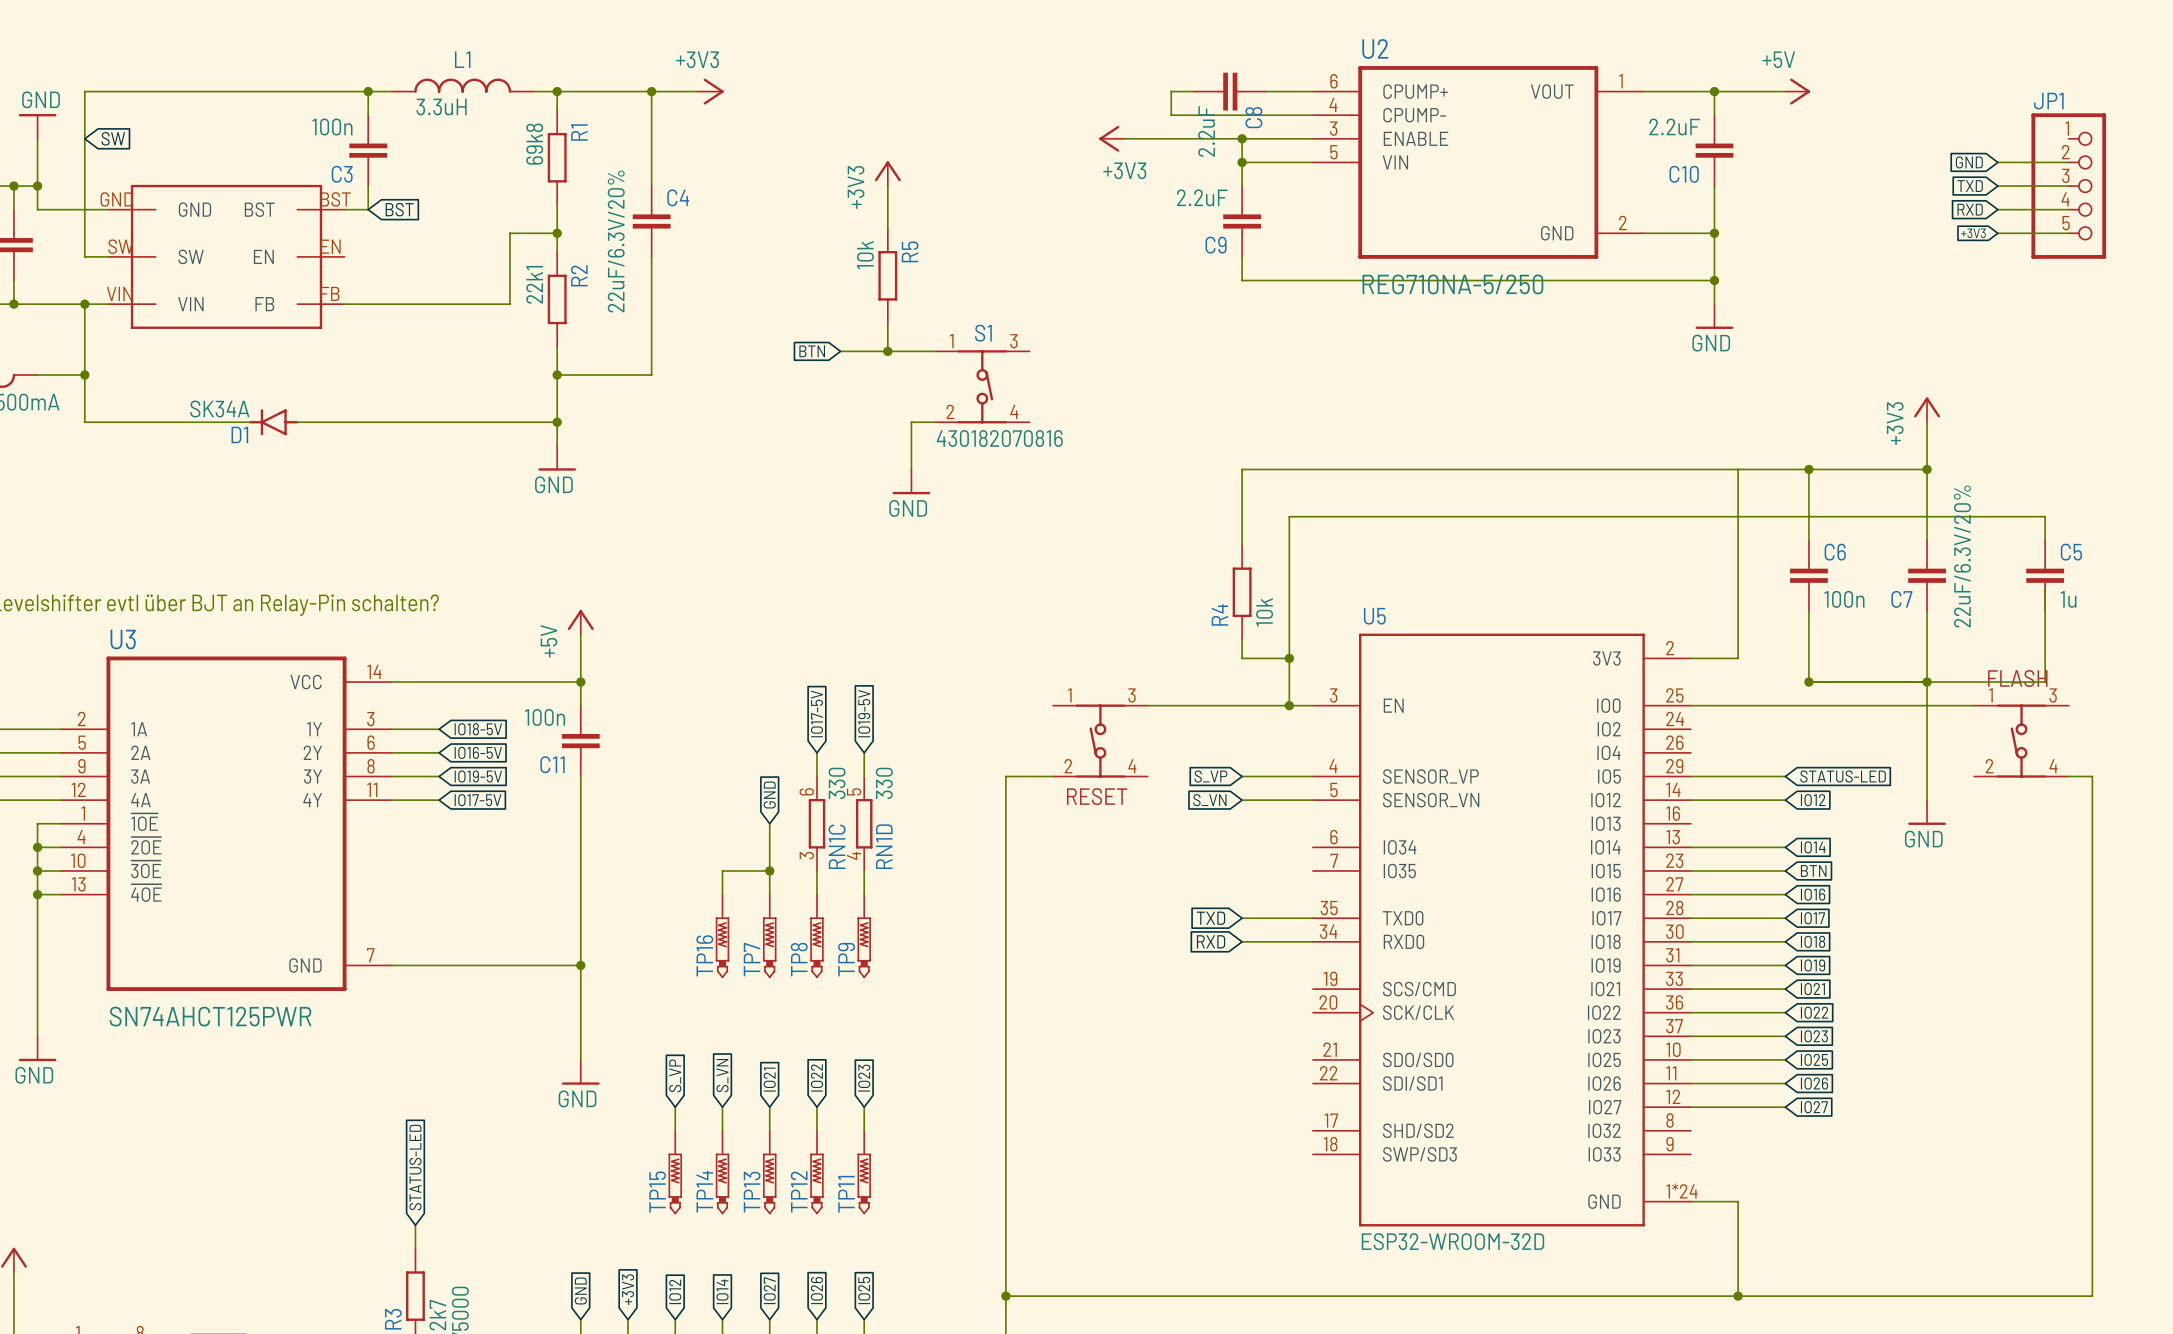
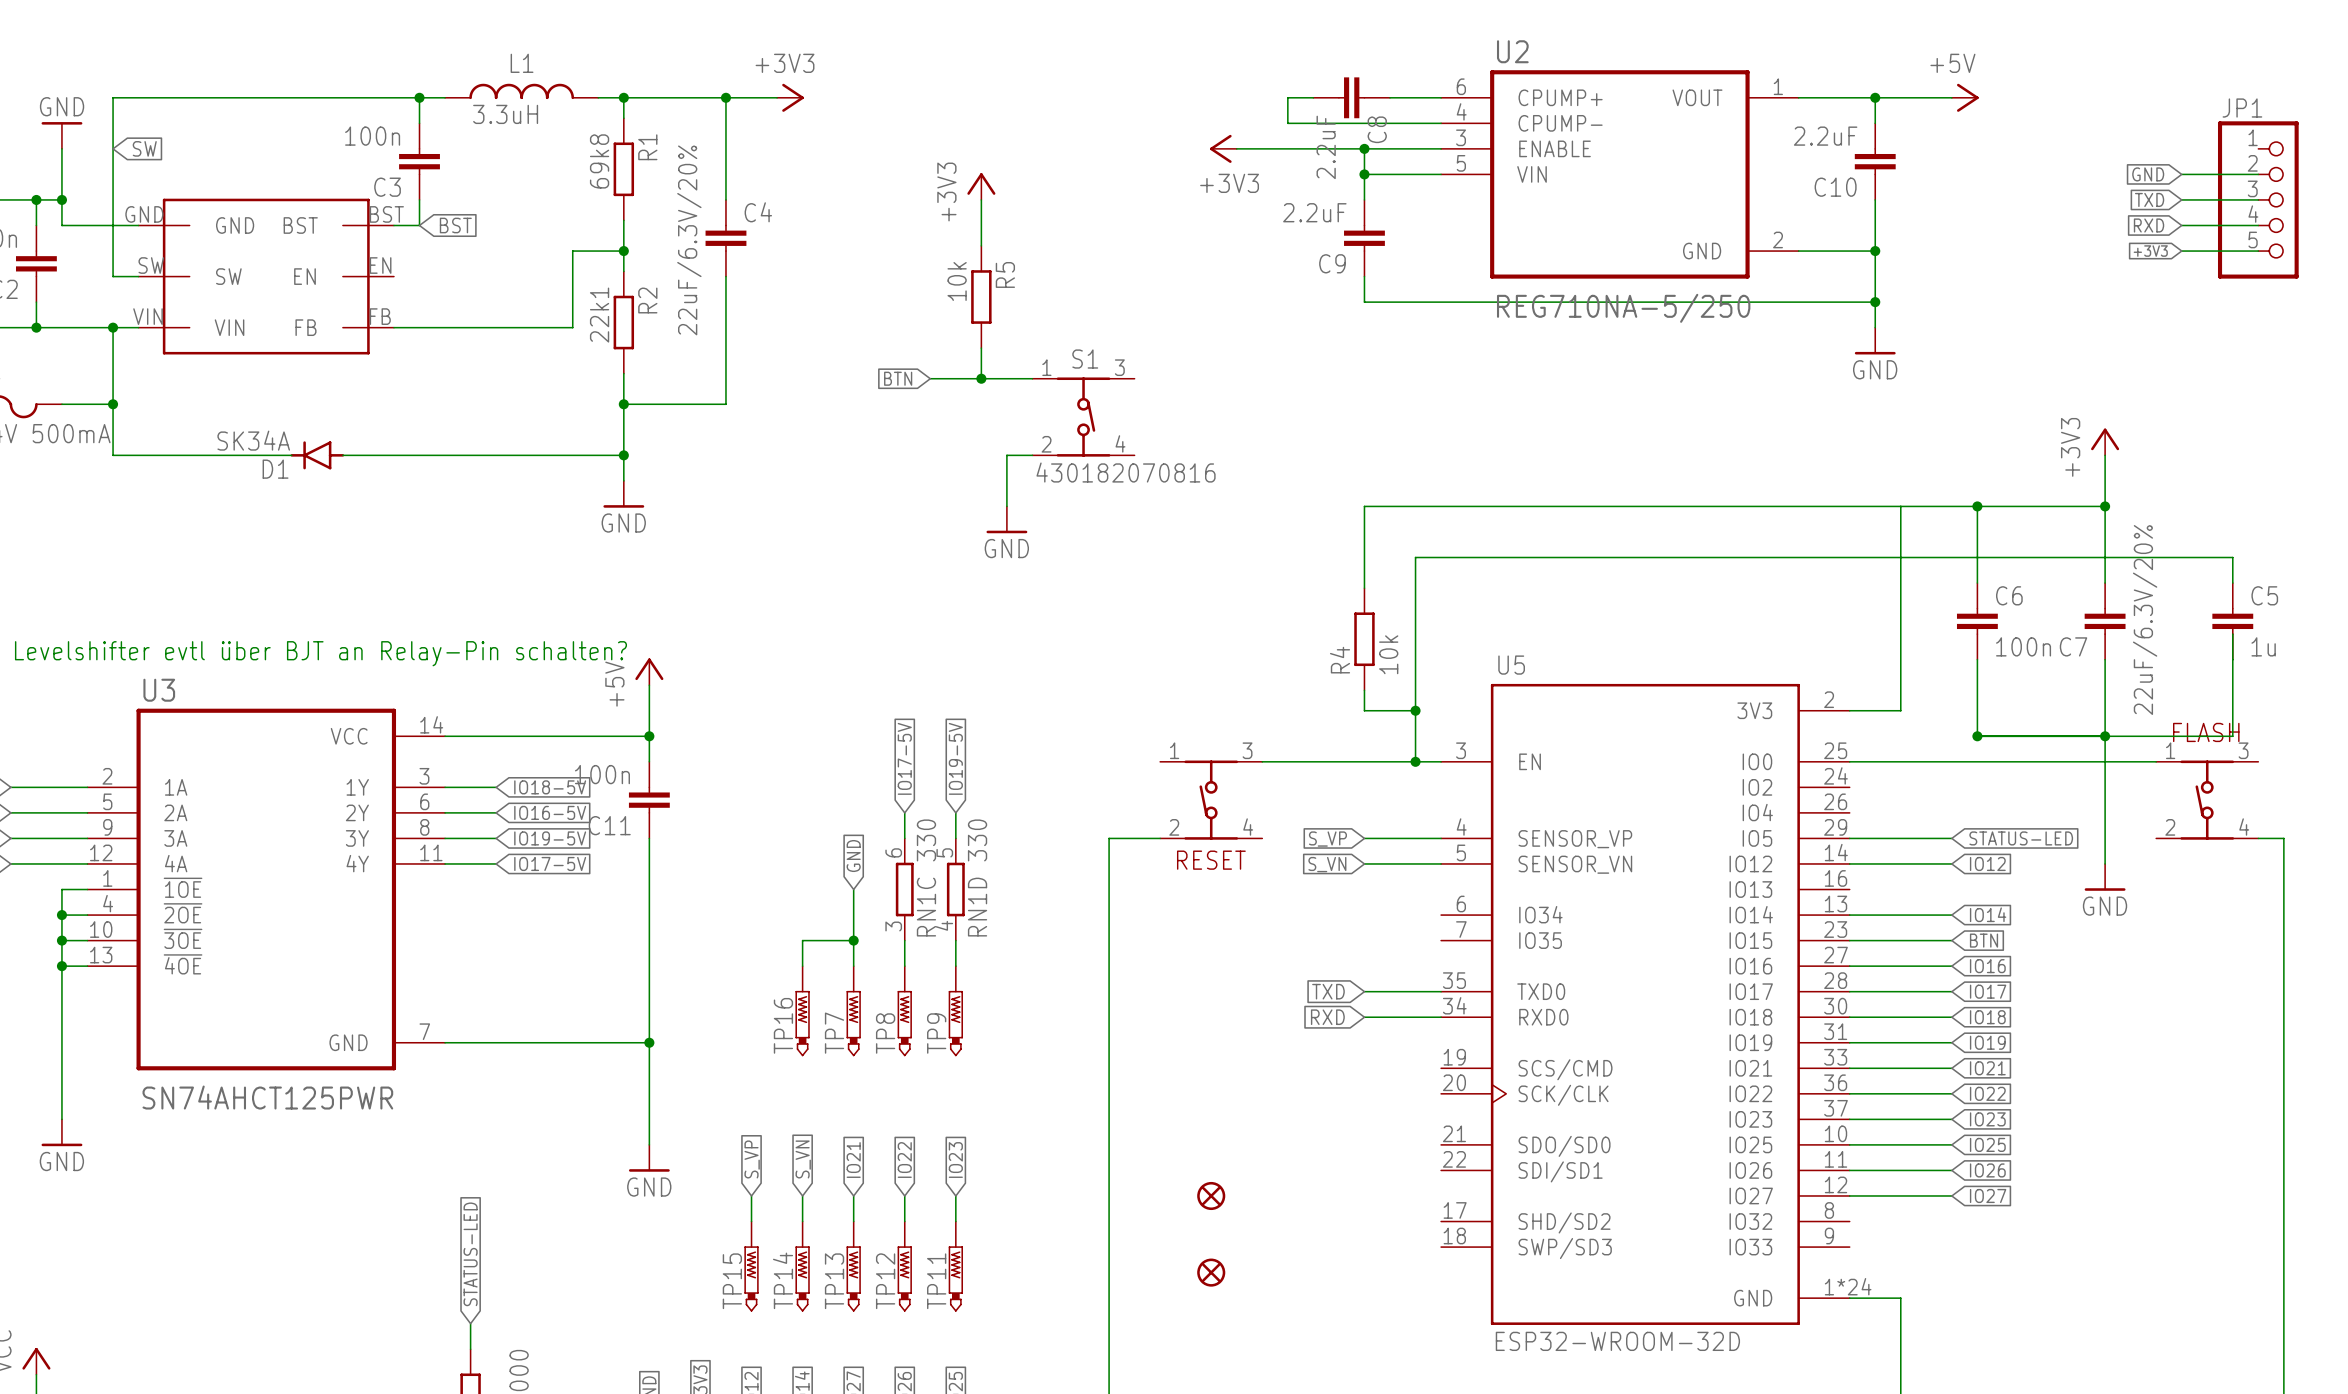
part: none -> (1211, 1195)
part: none -> (1211, 1272)

